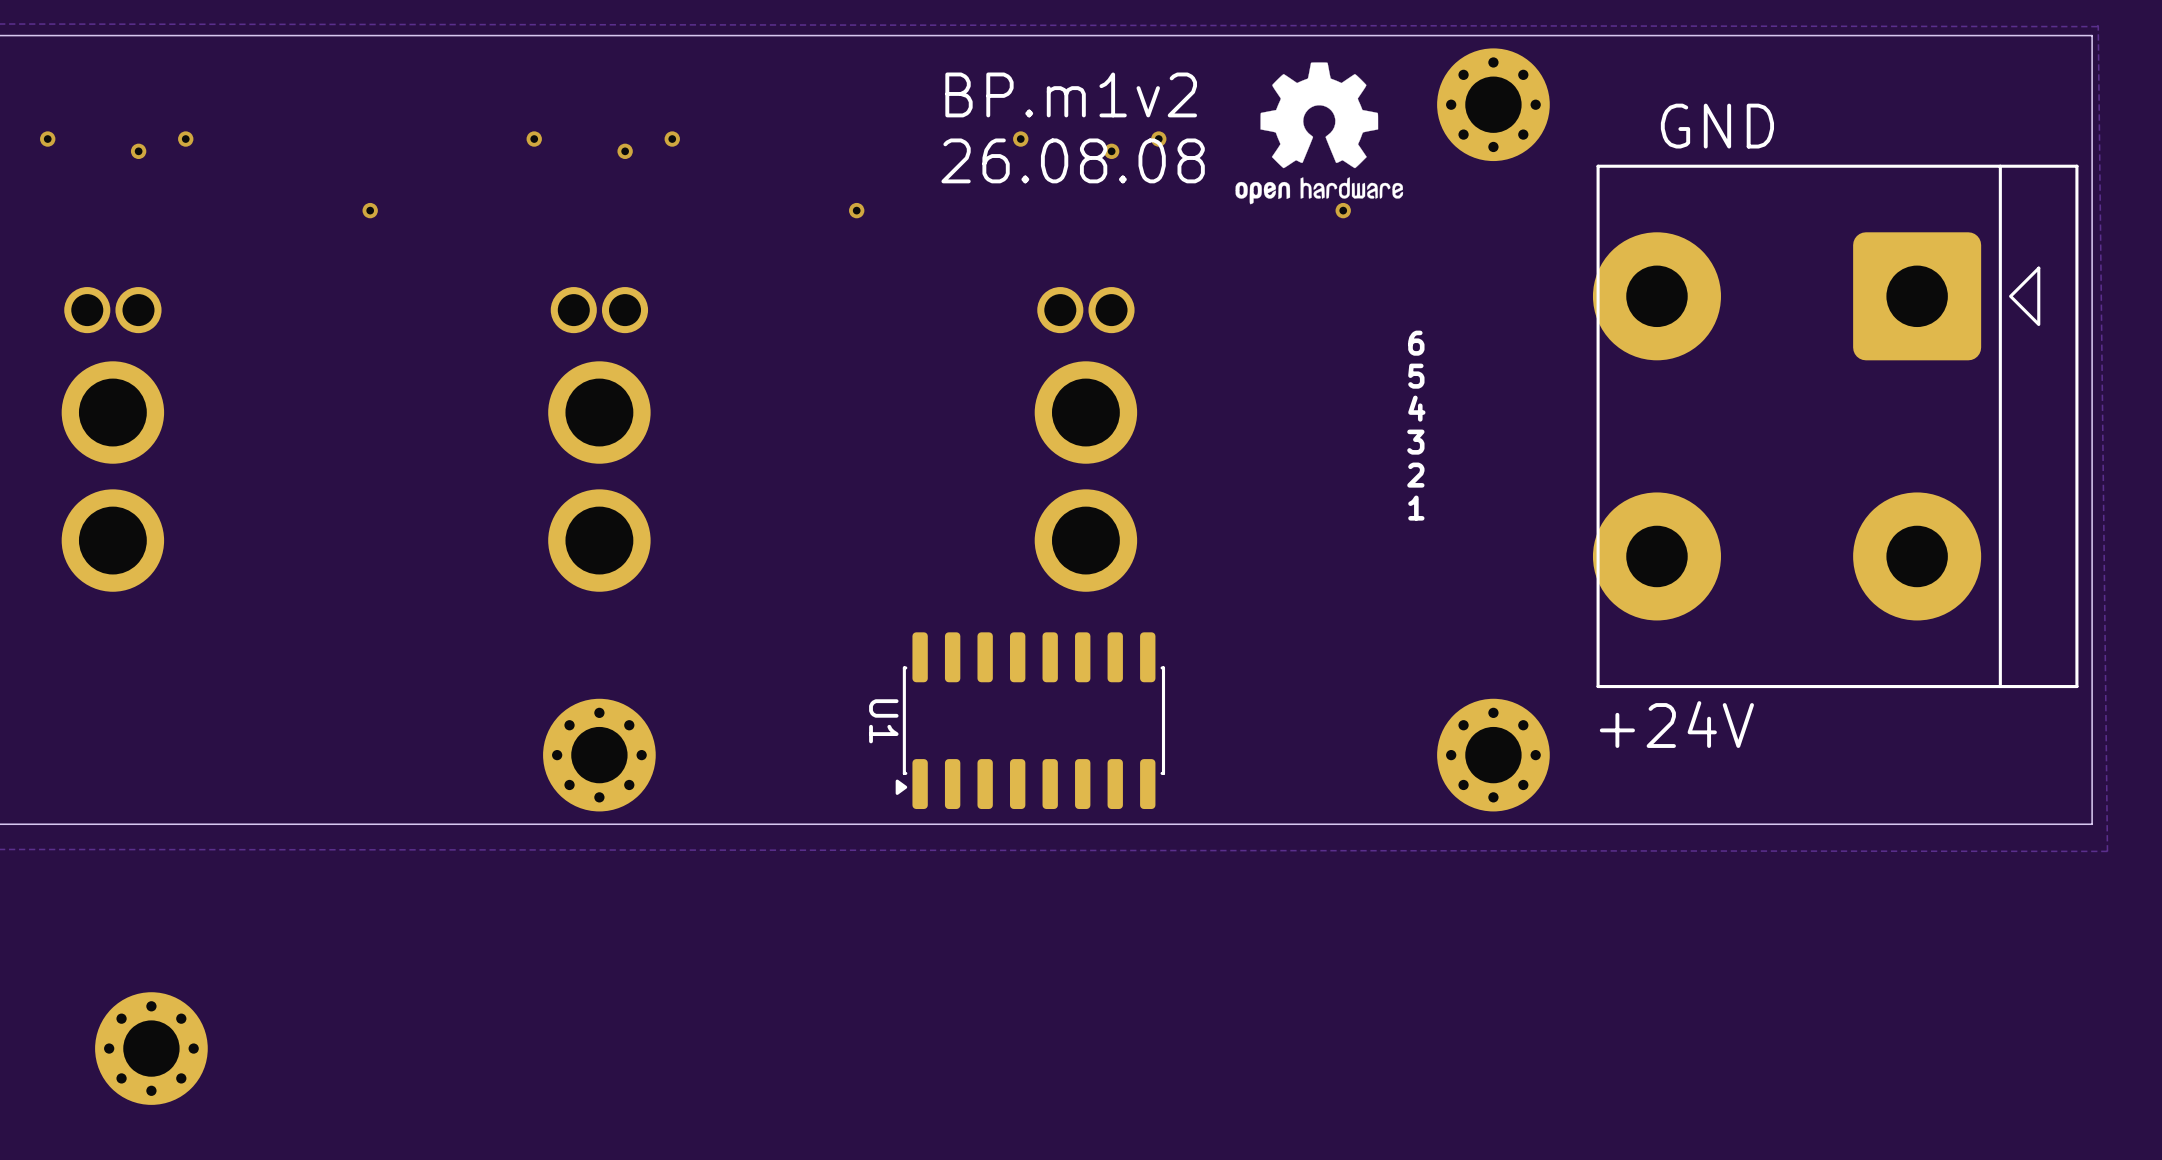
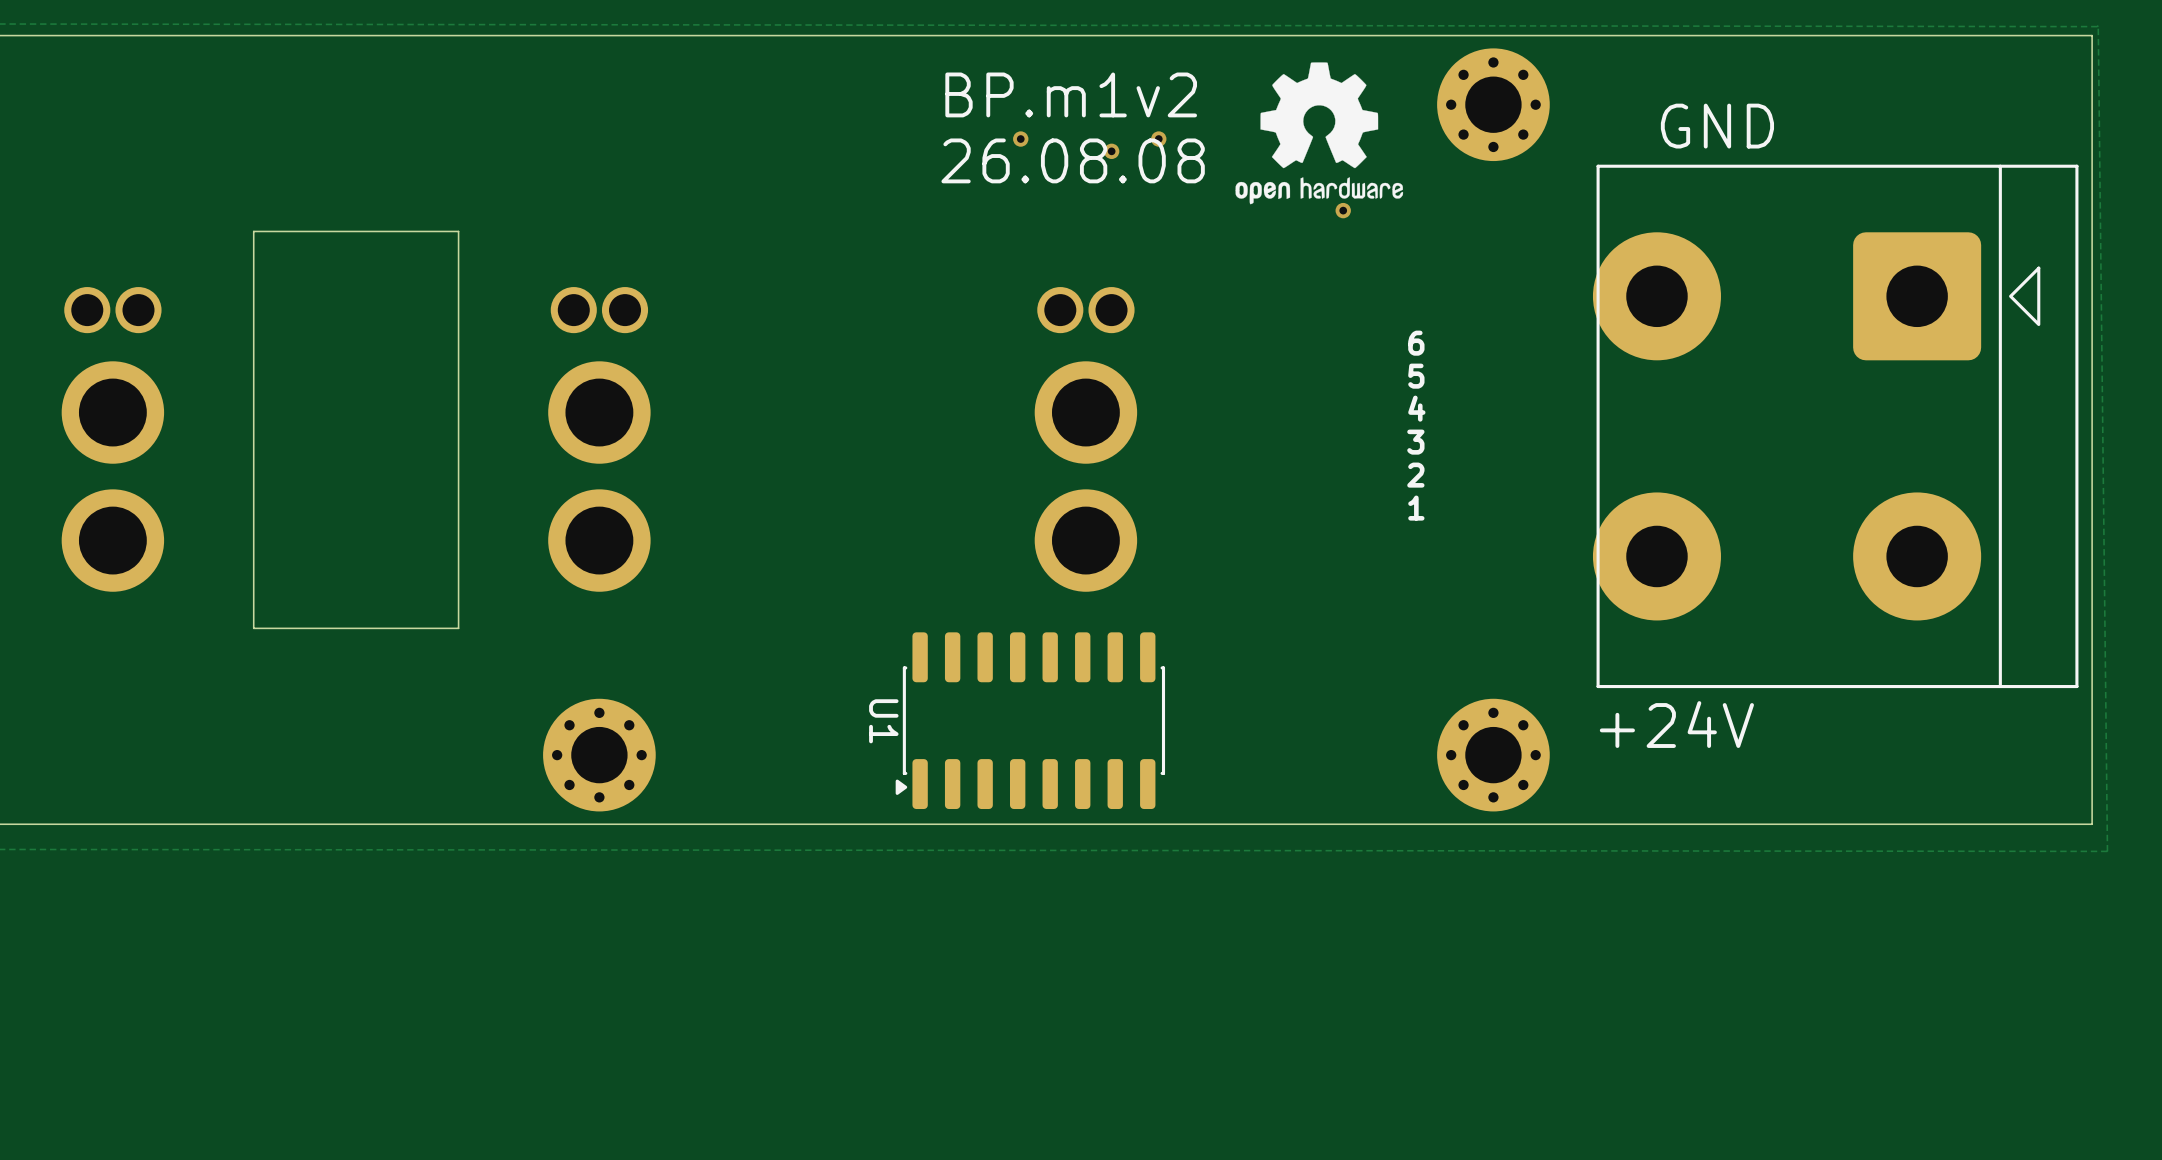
via: (47, 139) -> none
via: (185, 139) -> none
via: (534, 139) -> none
via: (672, 139) -> none
via: (138, 151) -> none
via: (625, 151) -> none
via: (370, 210) -> none
via: (856, 210) -> none
board edge: none -> (458, 231) (253, 231) (253, 628) (458, 628) (458, 231)
part: (151, 1048) -> none

